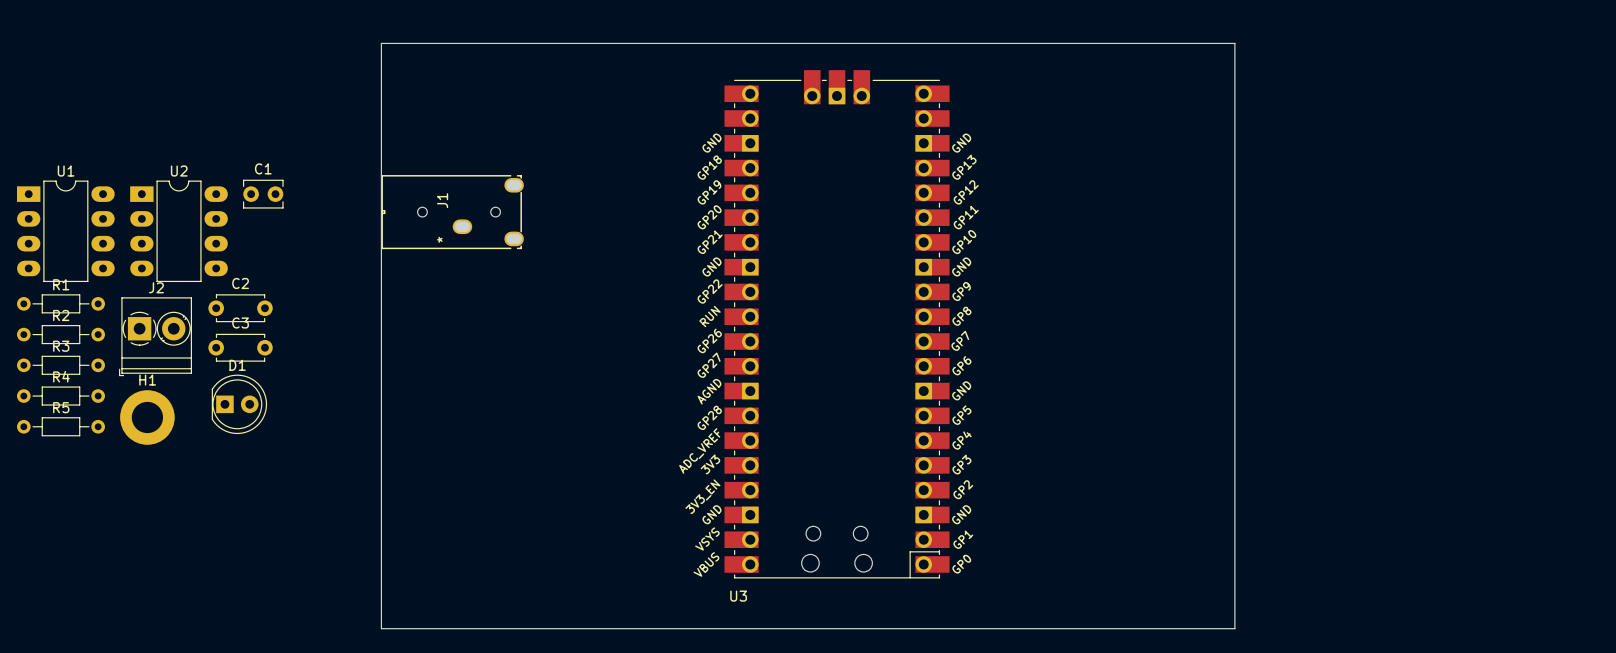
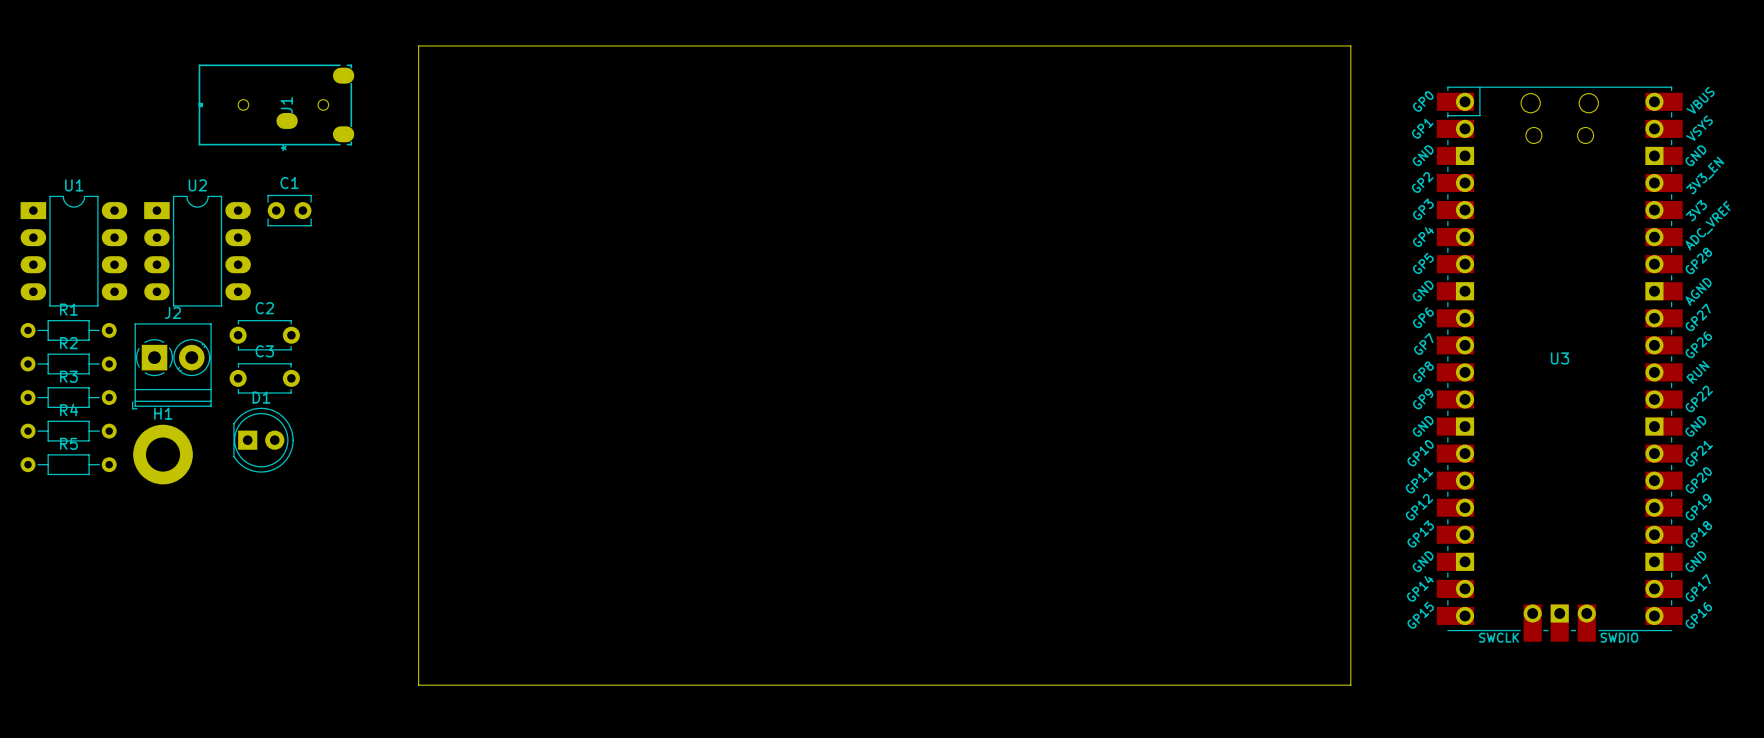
U3 footprint: [724, 70, 950, 579] -> [1436, 86, 1683, 642]
J1 footprint: [381, 175, 524, 250] -> [198, 64, 355, 146]
J1 name position: J1 (442, 200) -> J1 (286, 105)
U3 name position: U3 (738, 596) -> U3 (1559, 358)

